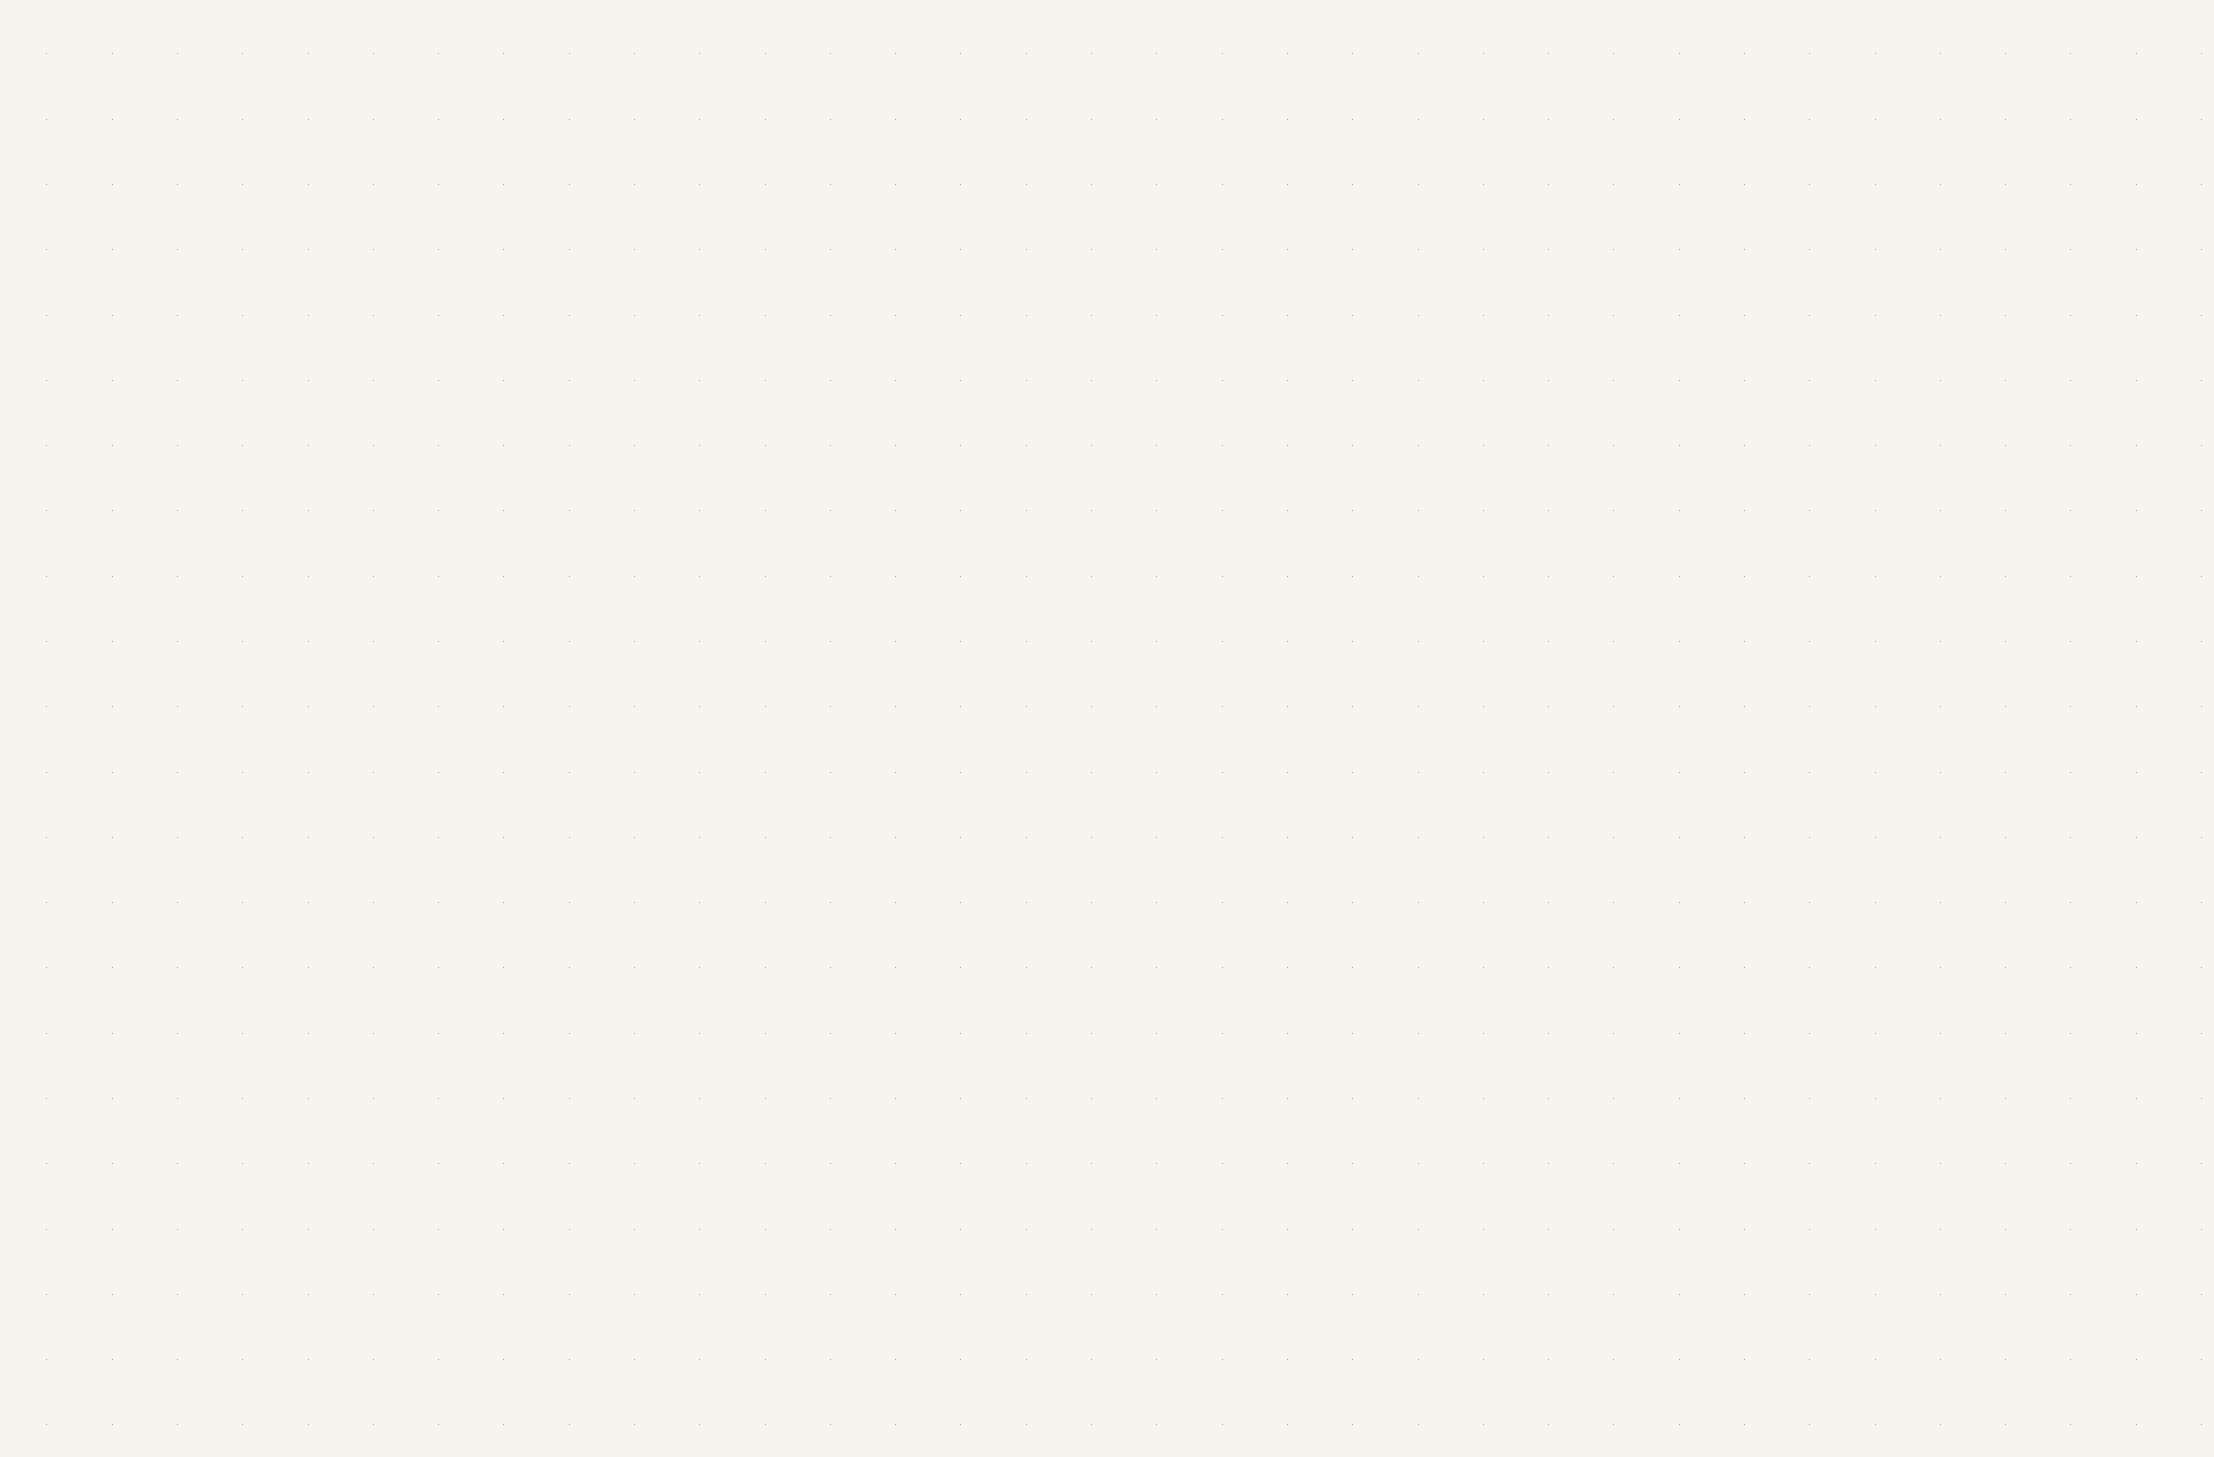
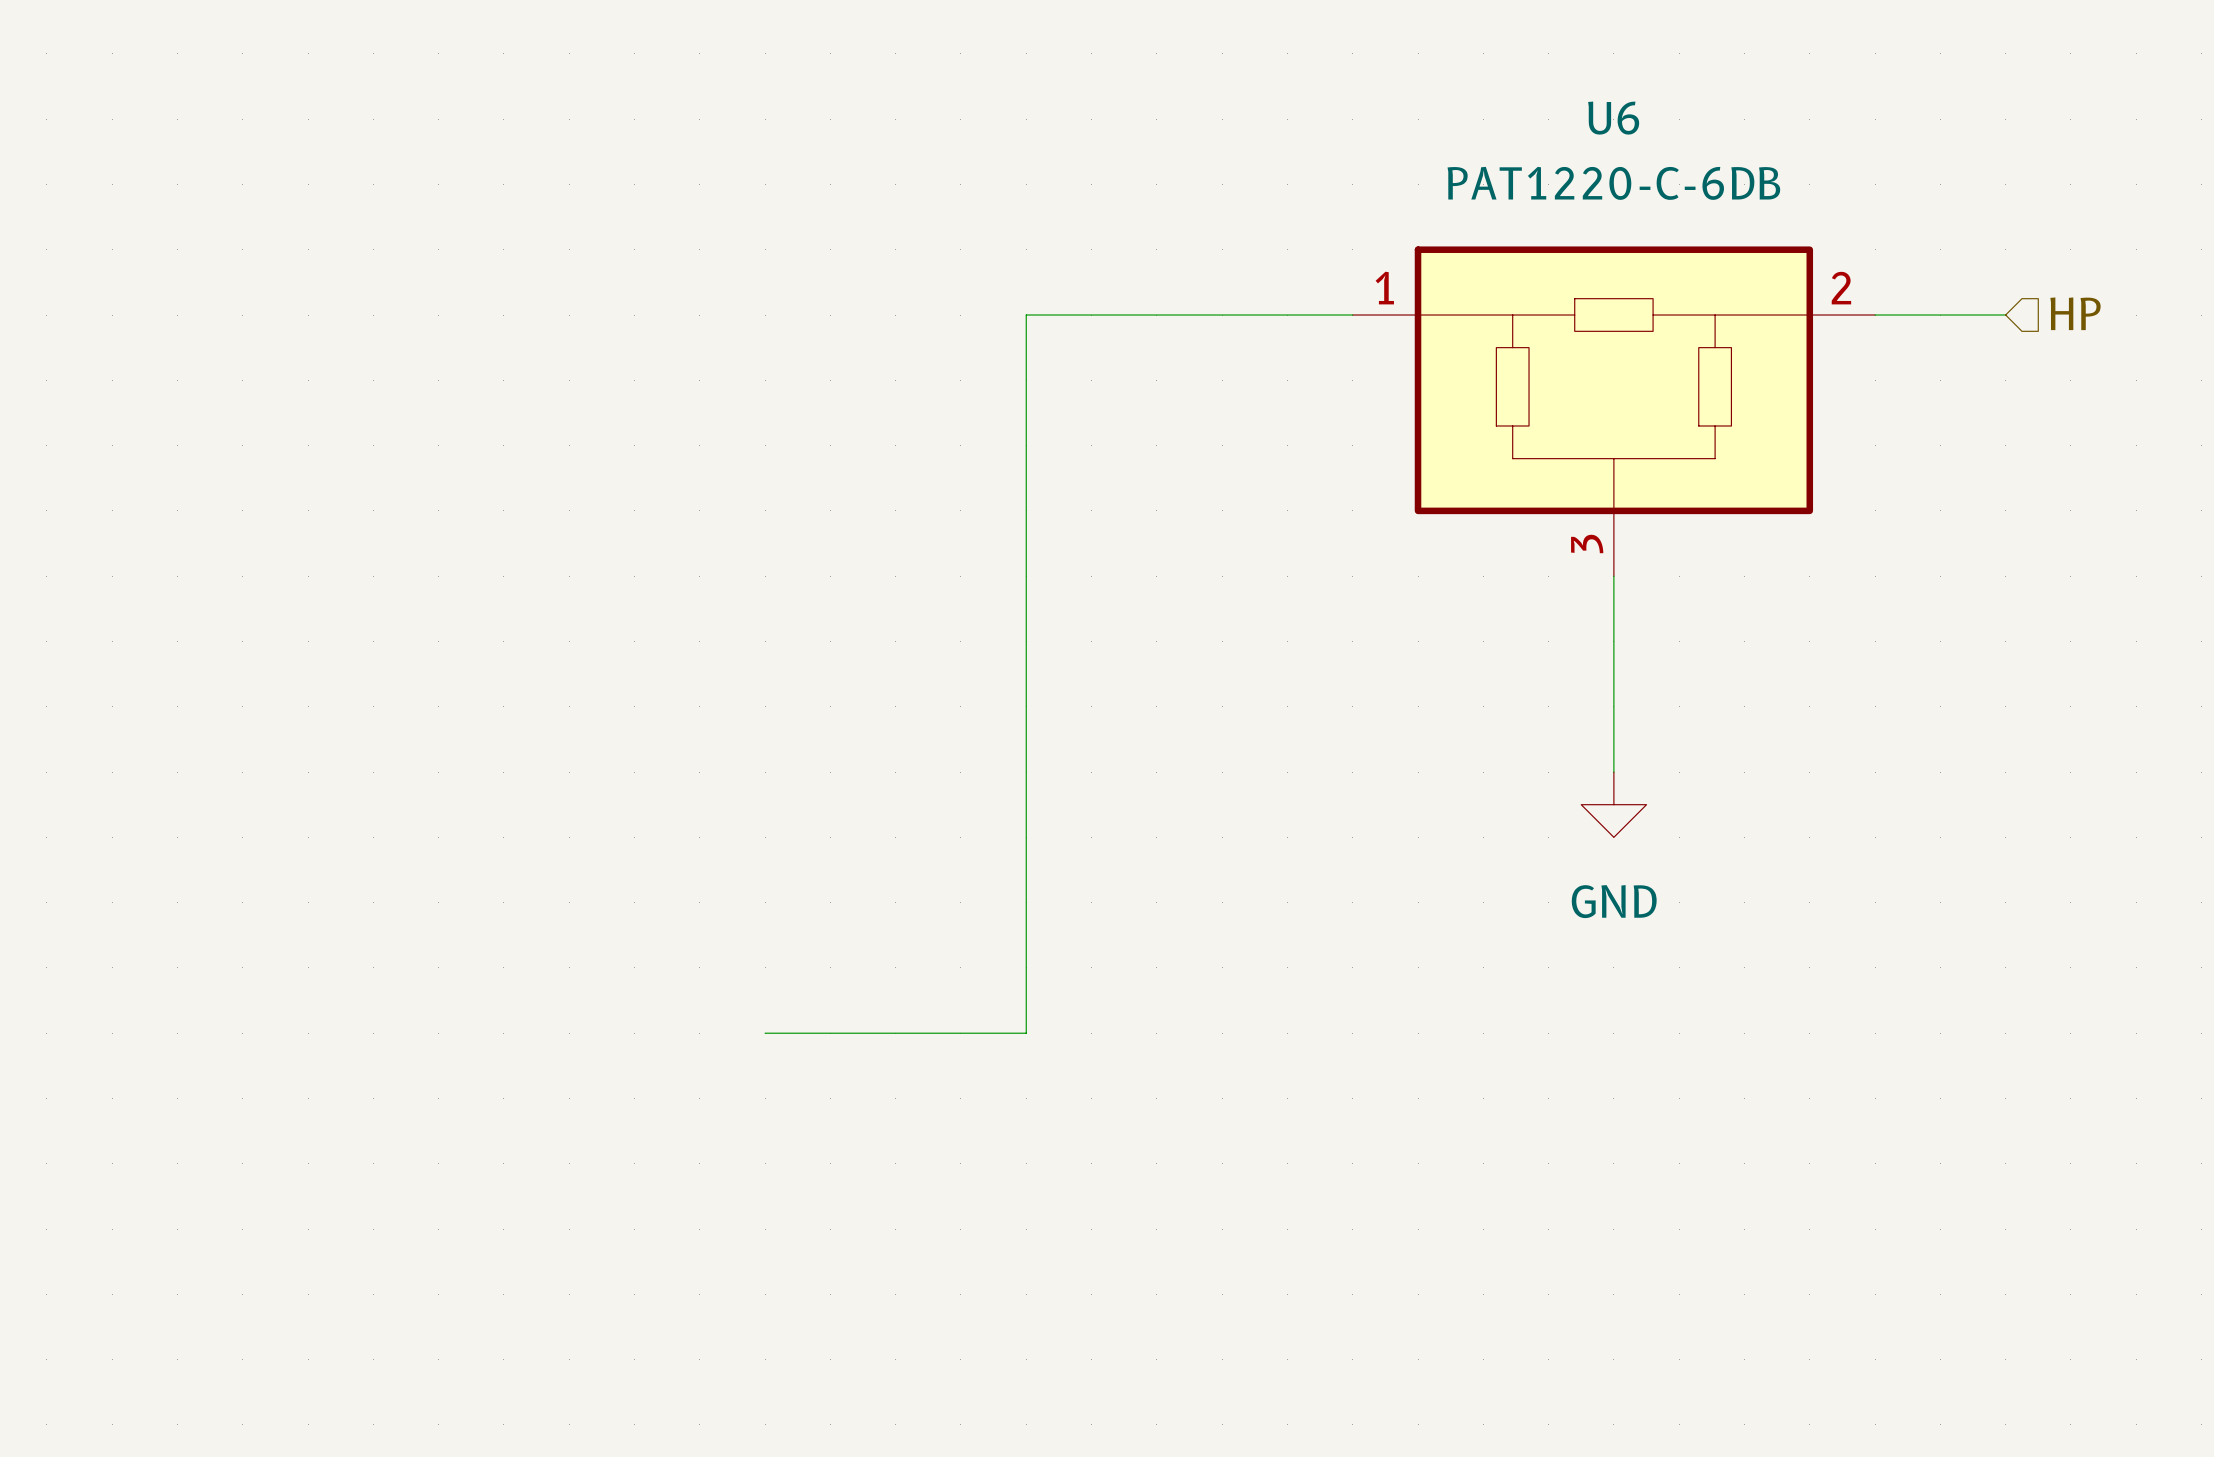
hierarchical label: none -> HP (2075, 313)
wire: none -> (1352, 315) (1026, 315) (1026, 1033) (765, 1033)
wire: none -> (1875, 315) (2005, 315)
U6: none -> PAT1220-C-6DB (1613, 411)
wire: none -> (1613, 576) (1613, 772)
power symbol: none -> GND (1613, 804)

